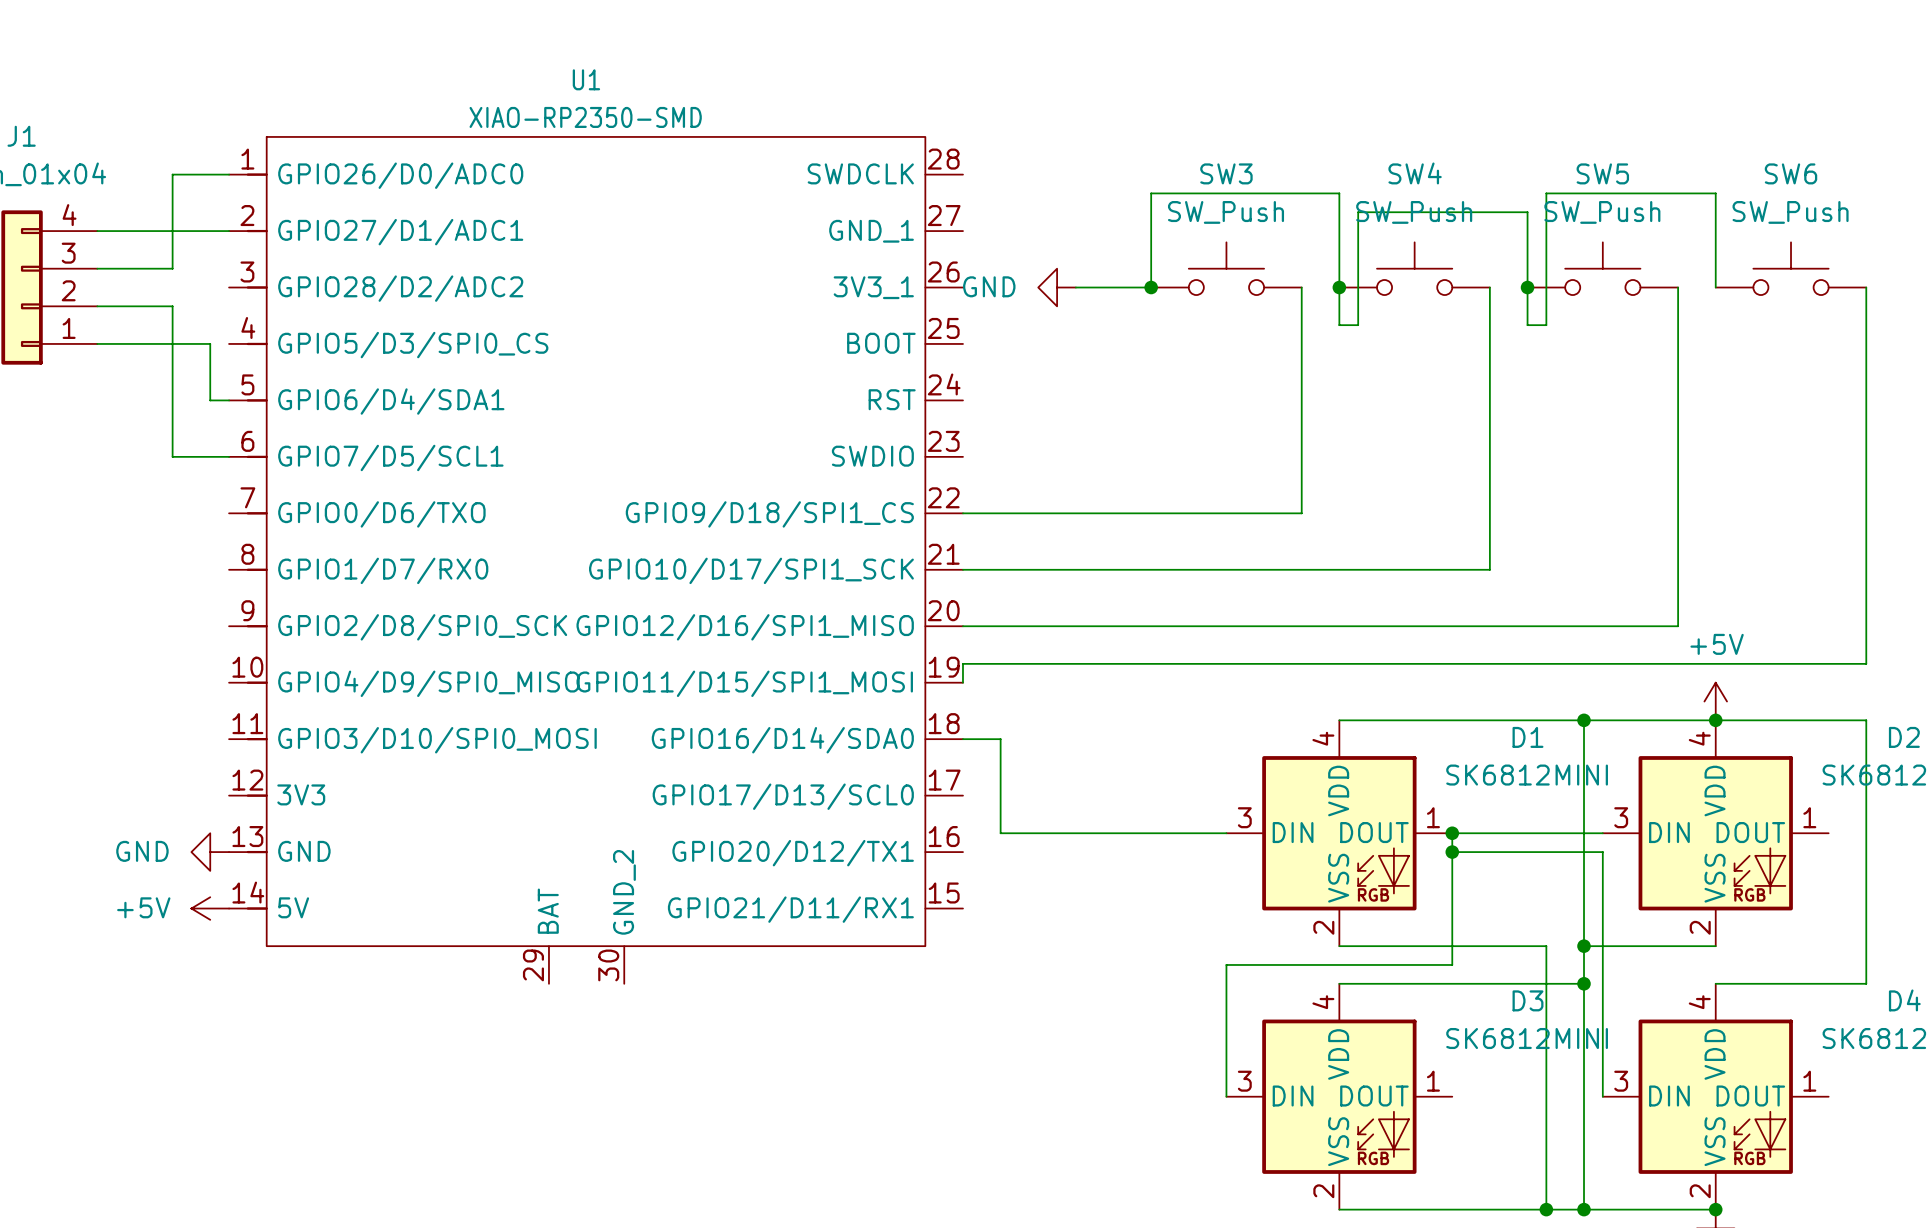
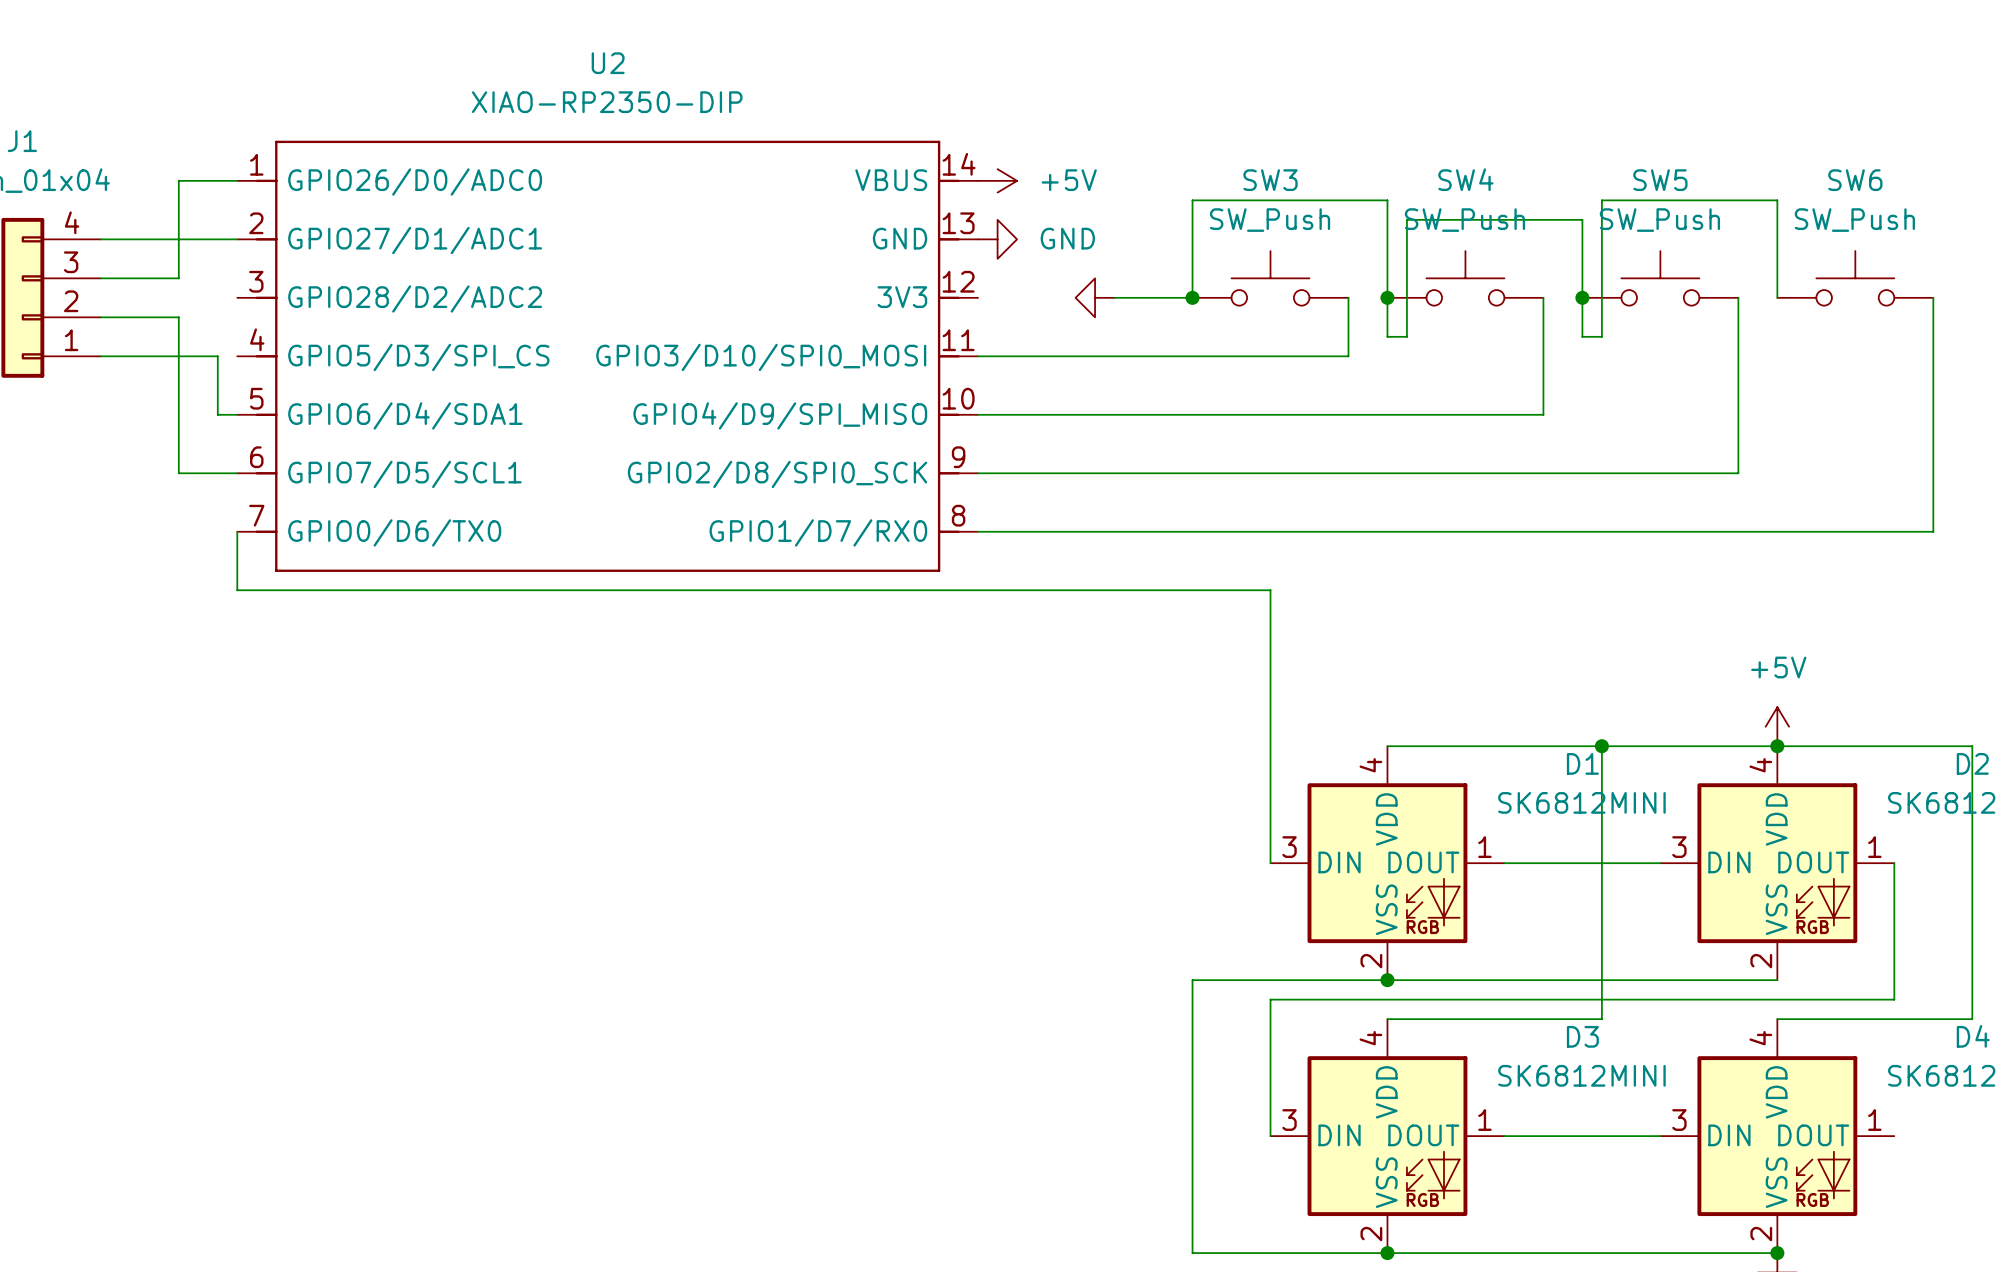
power symbol: none -> +5V (997, 180)
power symbol: none -> GND (997, 239)
power symbol text: GND (989, 286) -> none
U2: none -> XIAO-RP2350-DIP (607, 356)
wire: (1301, 343) (1301, 513) -> (1348, 356) (978, 356)
wire: (1489, 400) (1489, 569) (1226, 569) -> (1543, 414) (978, 414)
wire: (1678, 456) (1678, 626) (962, 626) -> (1738, 473) (978, 473)
wire: none -> (237, 531) (237, 590) (997, 590)
wire: (1866, 513) (1866, 663) (962, 663) (962, 682) -> (1933, 531) (1348, 531)
U1: XIAO-RP2350-SMD (596, 560) -> none
wire: none -> (1601, 746) (1601, 980) (1640, 980)
wire: (1584, 720) (1584, 1209) -> none
junction position: (1584, 720) -> (1601, 746)
wire: (1866, 720) (1866, 983) -> (1933, 746) (1972, 746) (1972, 1019) (1933, 1019)
wire: (962, 739) (1000, 739) (1000, 833) (1226, 833) -> (1270, 590) (1270, 863)
wire: (1452, 833) (1452, 964) -> (1894, 863) (1894, 999) (1504, 999)
junction: (1452, 833) -> none
power symbol: GND (210, 852) -> none
wire: (1452, 852) (1602, 852) (1602, 1096) -> (1504, 1136) (1660, 1136)
junction: (1452, 852) -> none
power symbol: +5V (210, 908) -> none
wire: none -> (1387, 980) (1192, 980) (1192, 1253) (1387, 1253)
junction: none -> (1387, 980)
junction: (1584, 946) -> none
wire: (1584, 983) (1546, 983) (1546, 1209) -> none
junction: (1584, 983) -> none
junction: none -> (1387, 1253)
junction: (1546, 1209) -> none
junction: (1584, 1209) -> none

